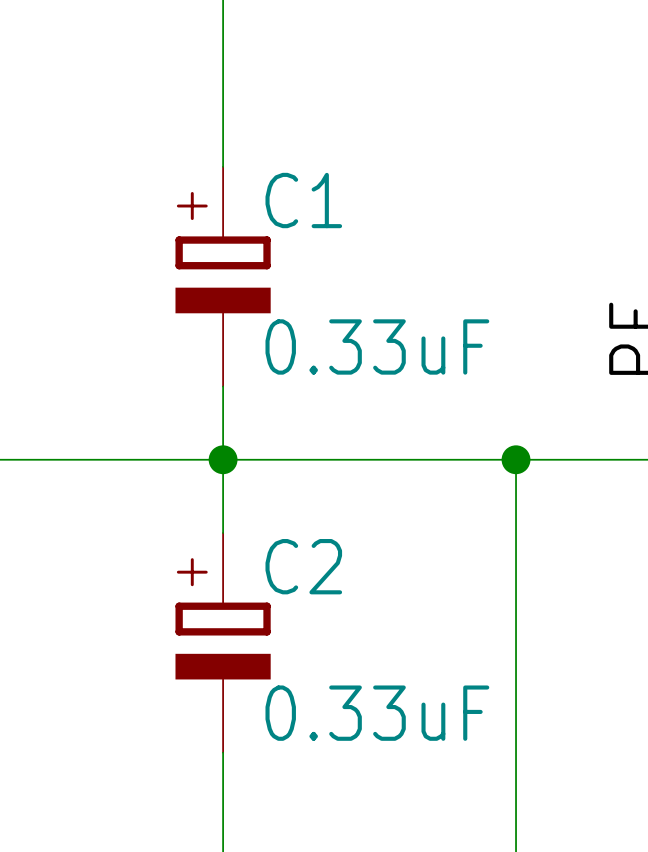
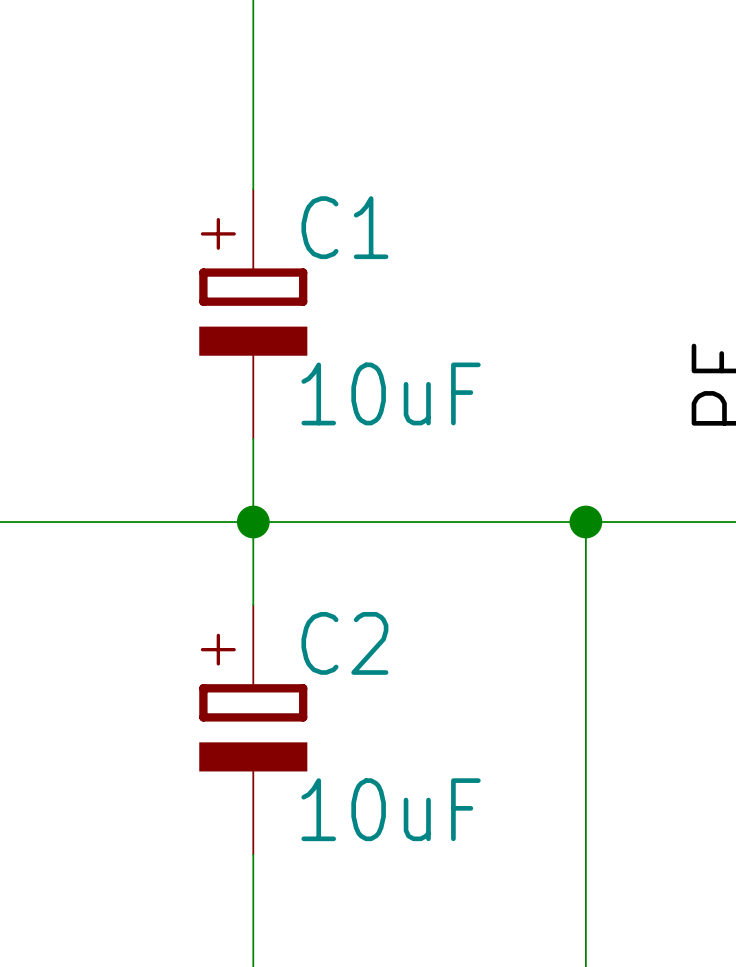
C1 value: 0.33uF (377, 346) -> 10uF (391, 393)
C2 value: 0.33uF (377, 713) -> 10uF (391, 809)

